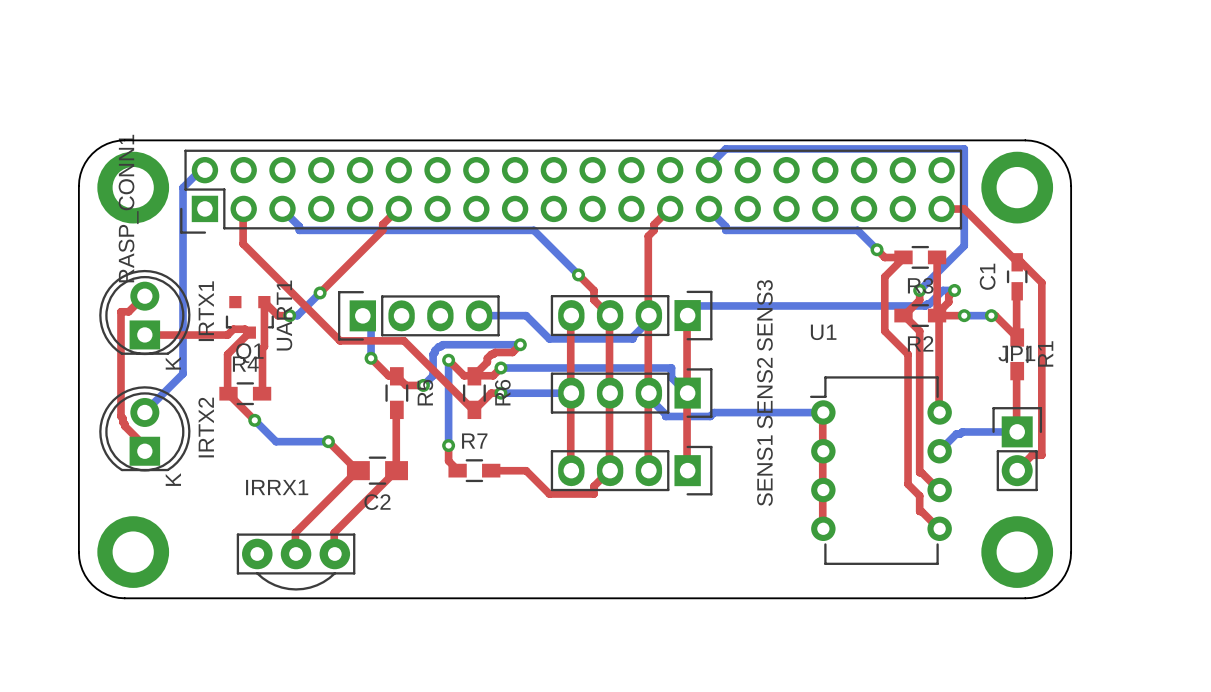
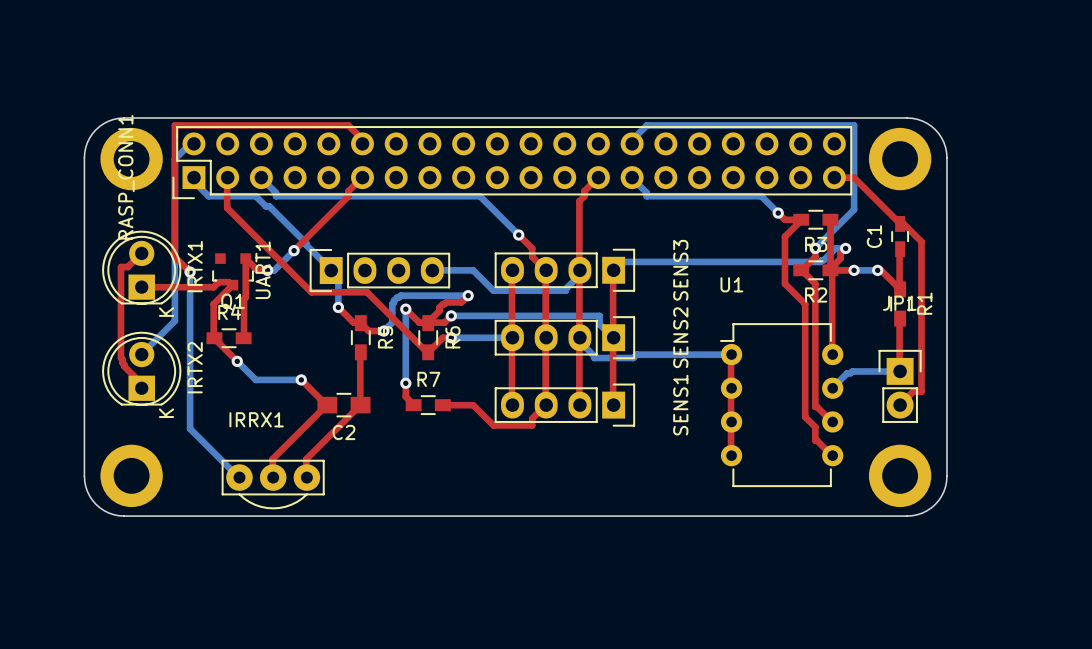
top track: none -> (362, 143) (361, 138) (348, 125) (174, 125) (174, 256) (190, 272)
bottom track: none -> (193, 177) (193, 181) (208, 196) (255, 196) (265, 206) (269, 206) (331, 270)
bottom track: none -> (190, 272) (190, 428) (239, 477)
via: none -> (190, 272)

